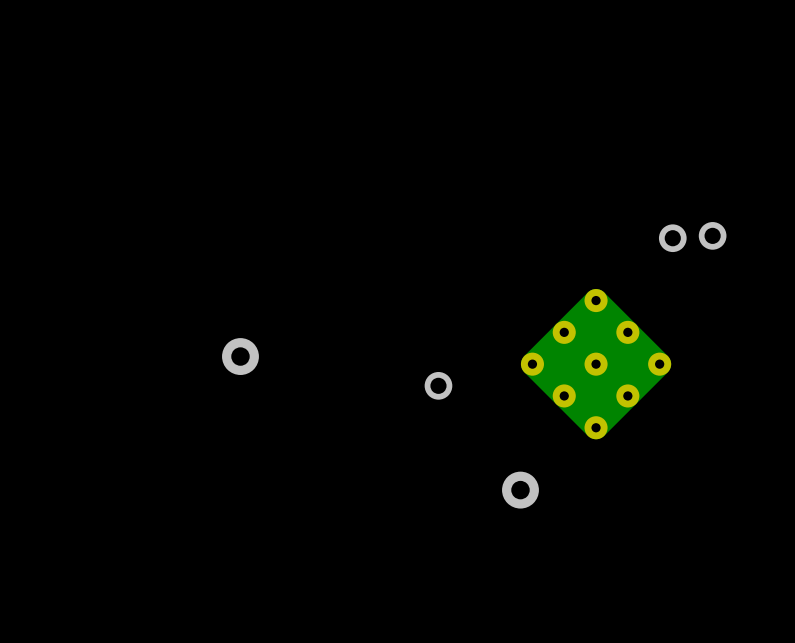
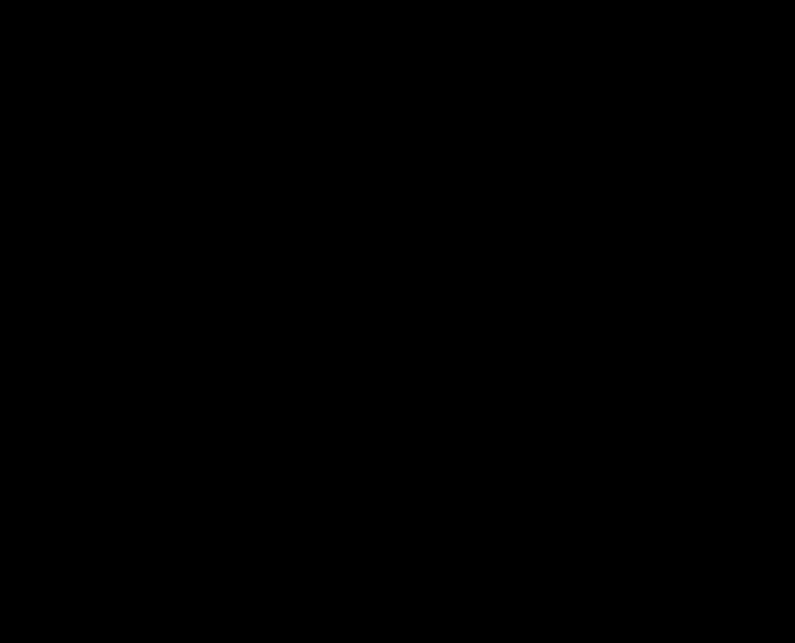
via: (712, 235) -> none
via: (672, 238) -> none
via: (240, 356) -> none
part: (596, 364) -> none
via: (438, 385) -> none
via: (520, 490) -> none

